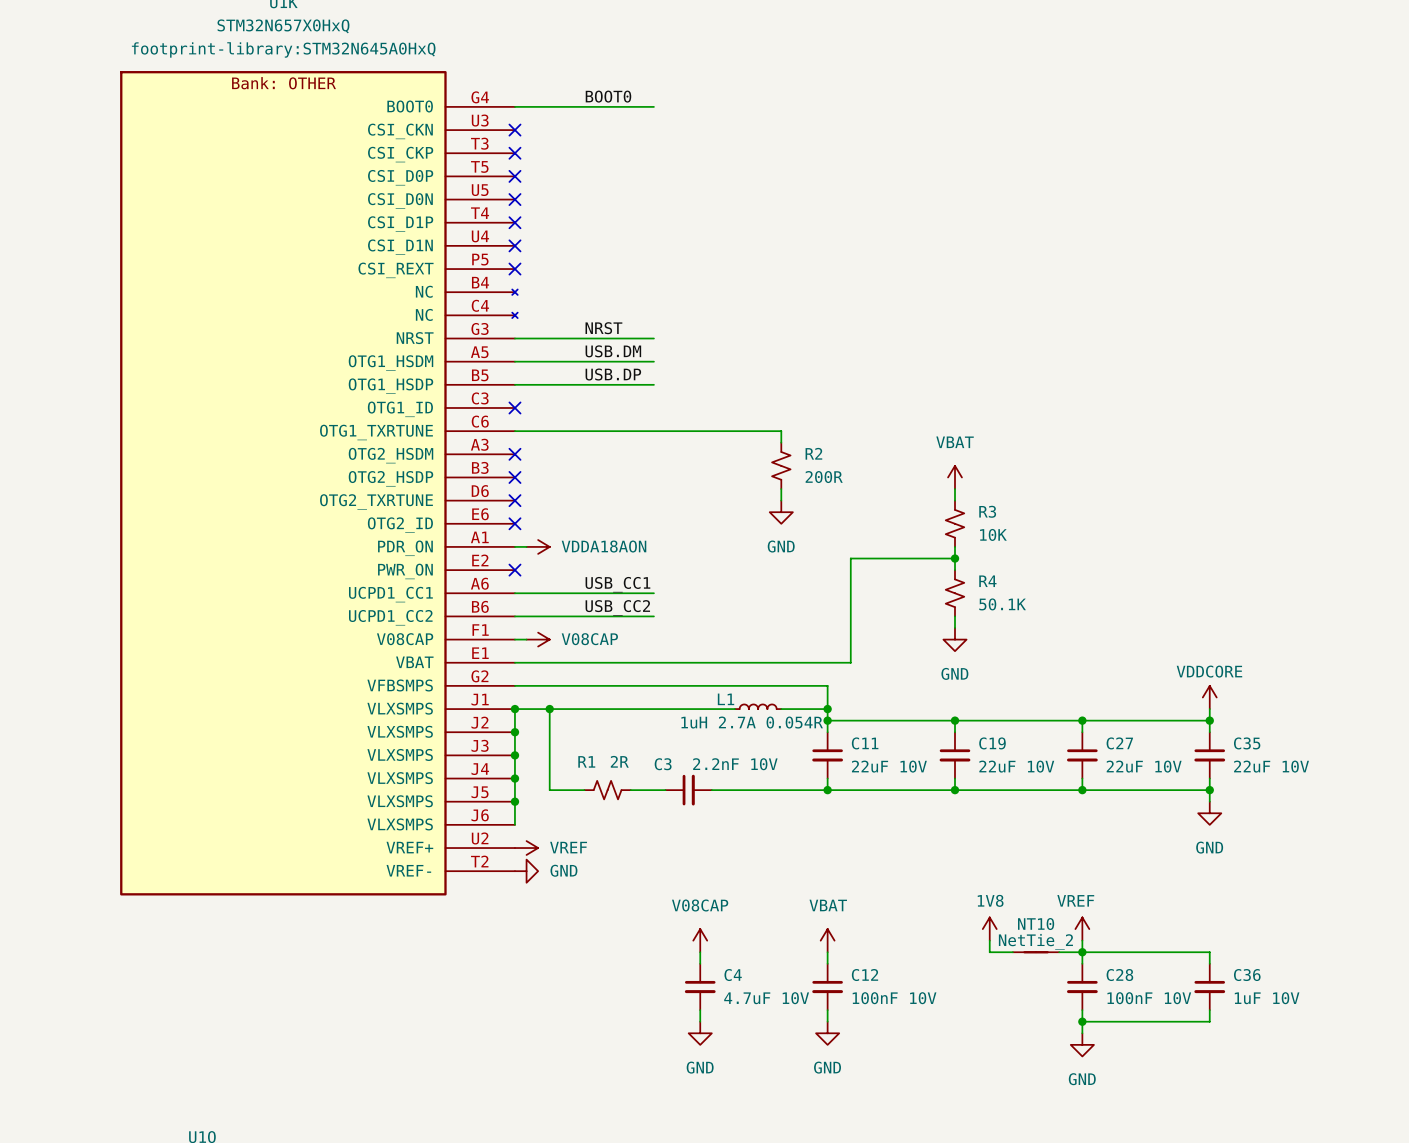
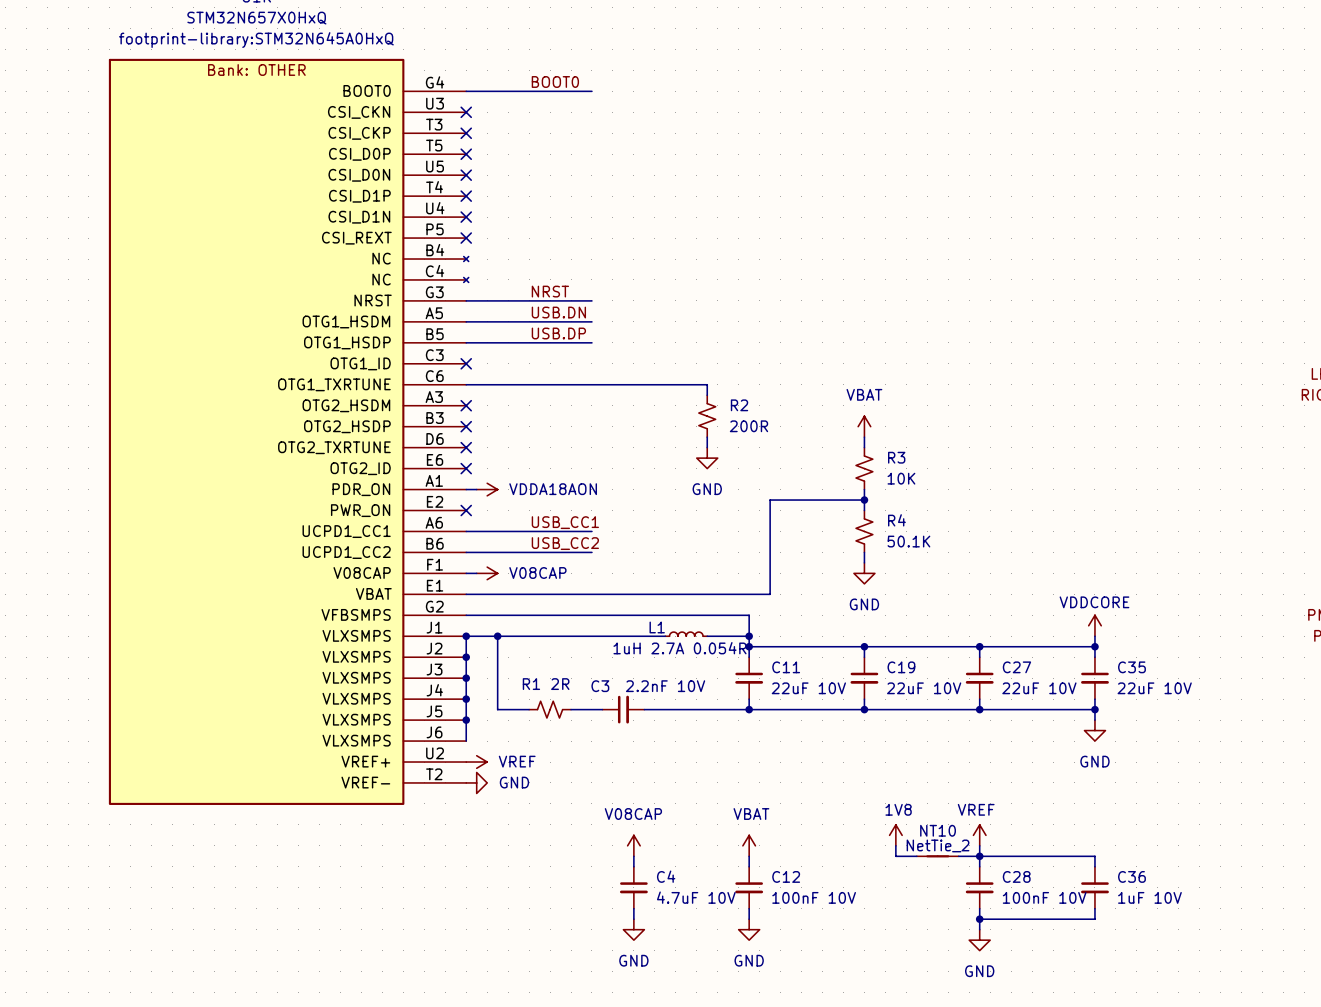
label: USB.DM (613, 351) -> USB.DN (558, 312)

